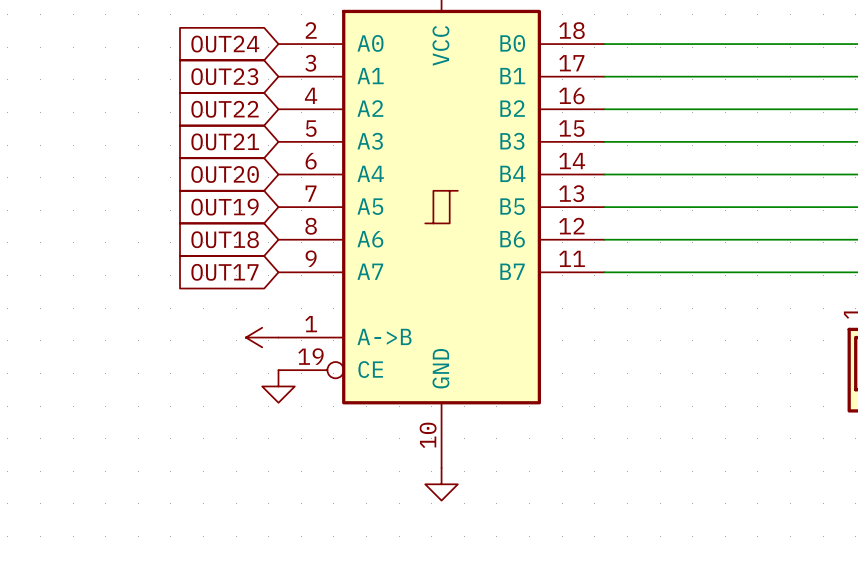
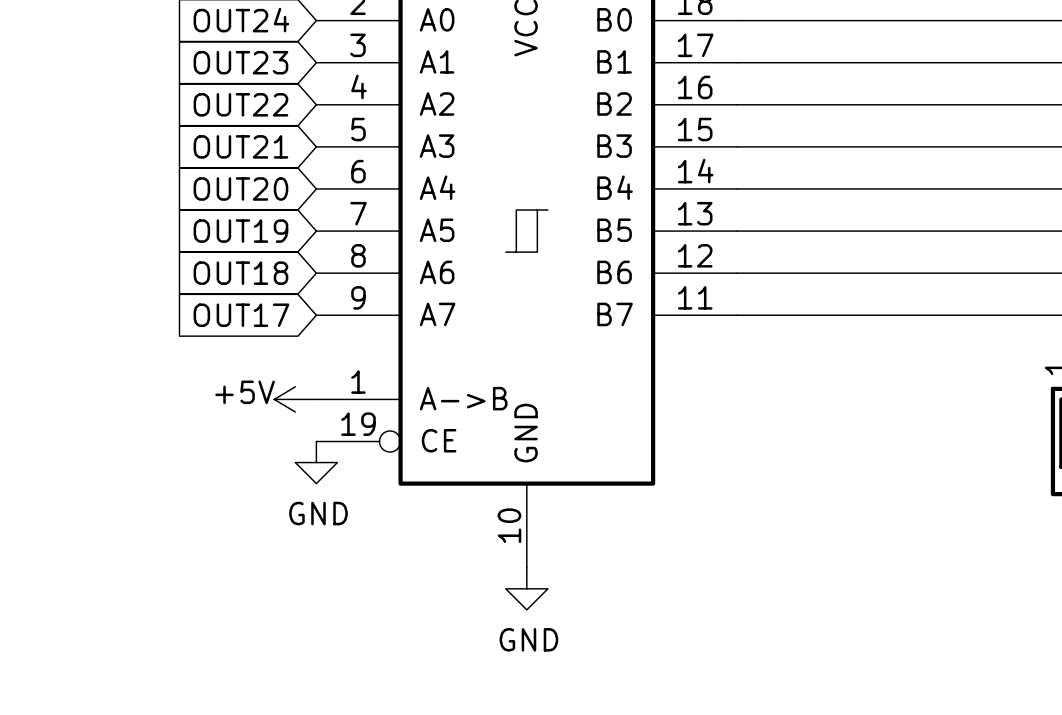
power symbol text: none -> +5V (245, 392)
power symbol text: none -> GND (318, 513)
power symbol text: none -> GND (528, 639)

